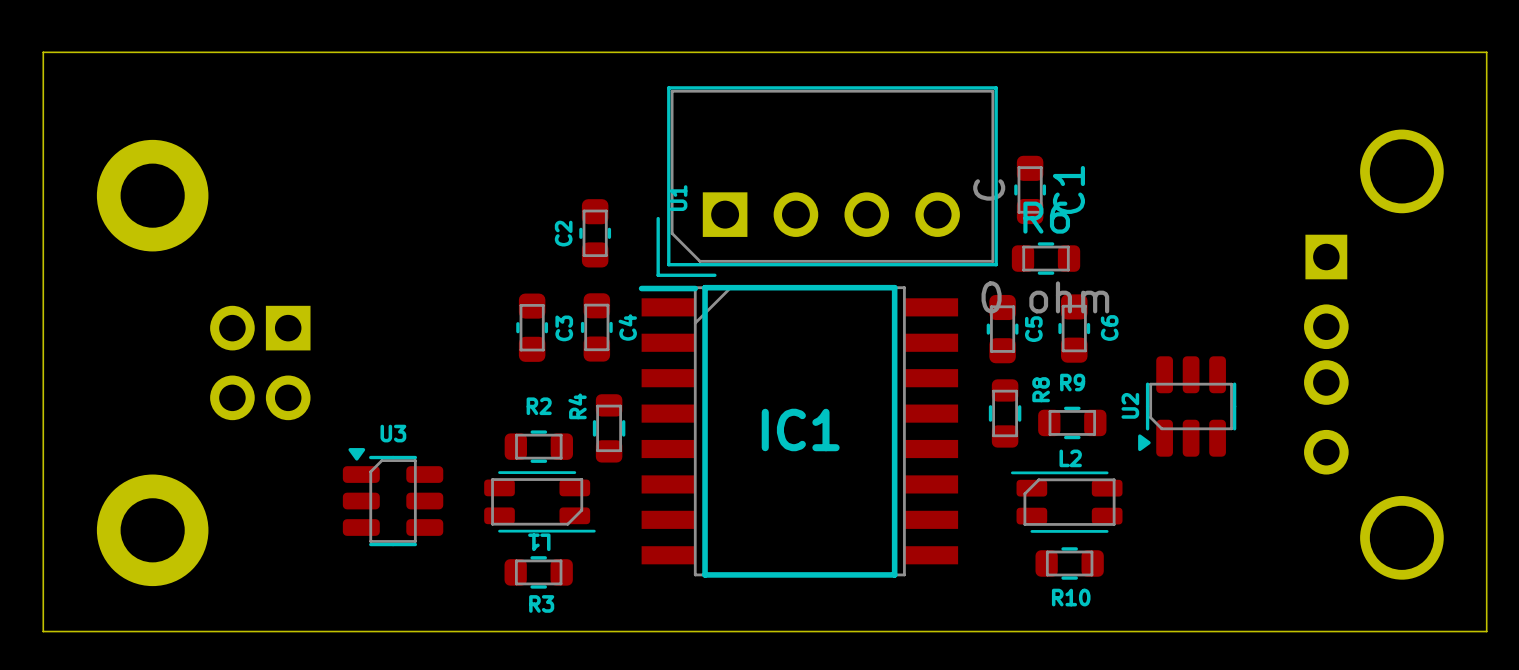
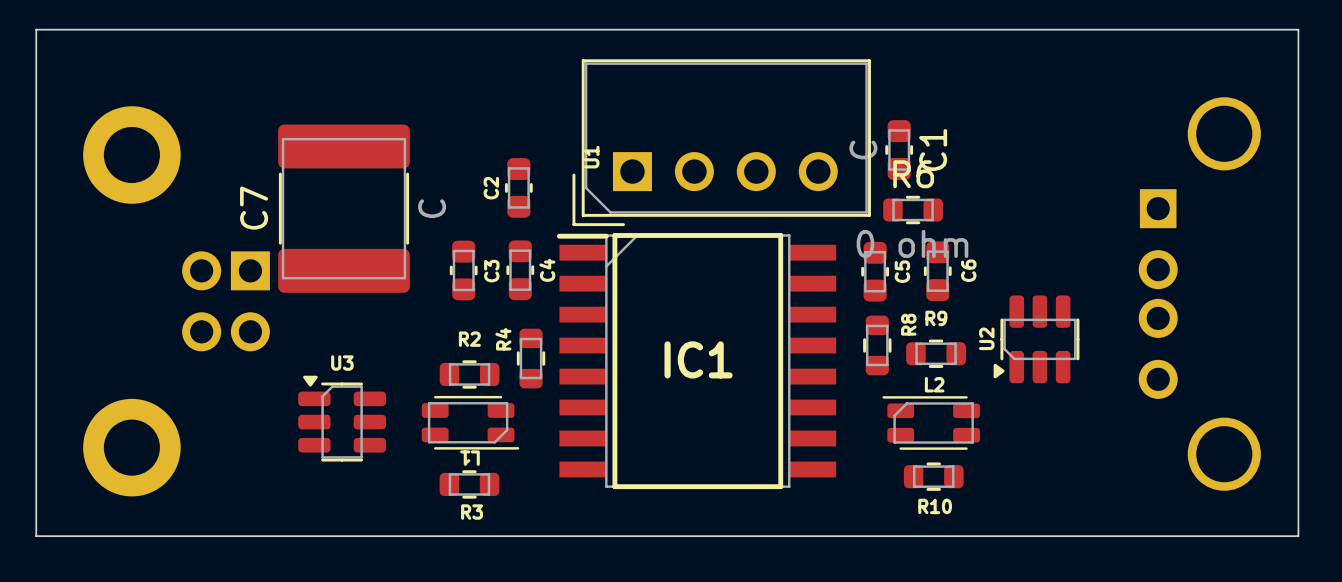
C7: none -> C (343, 208)

